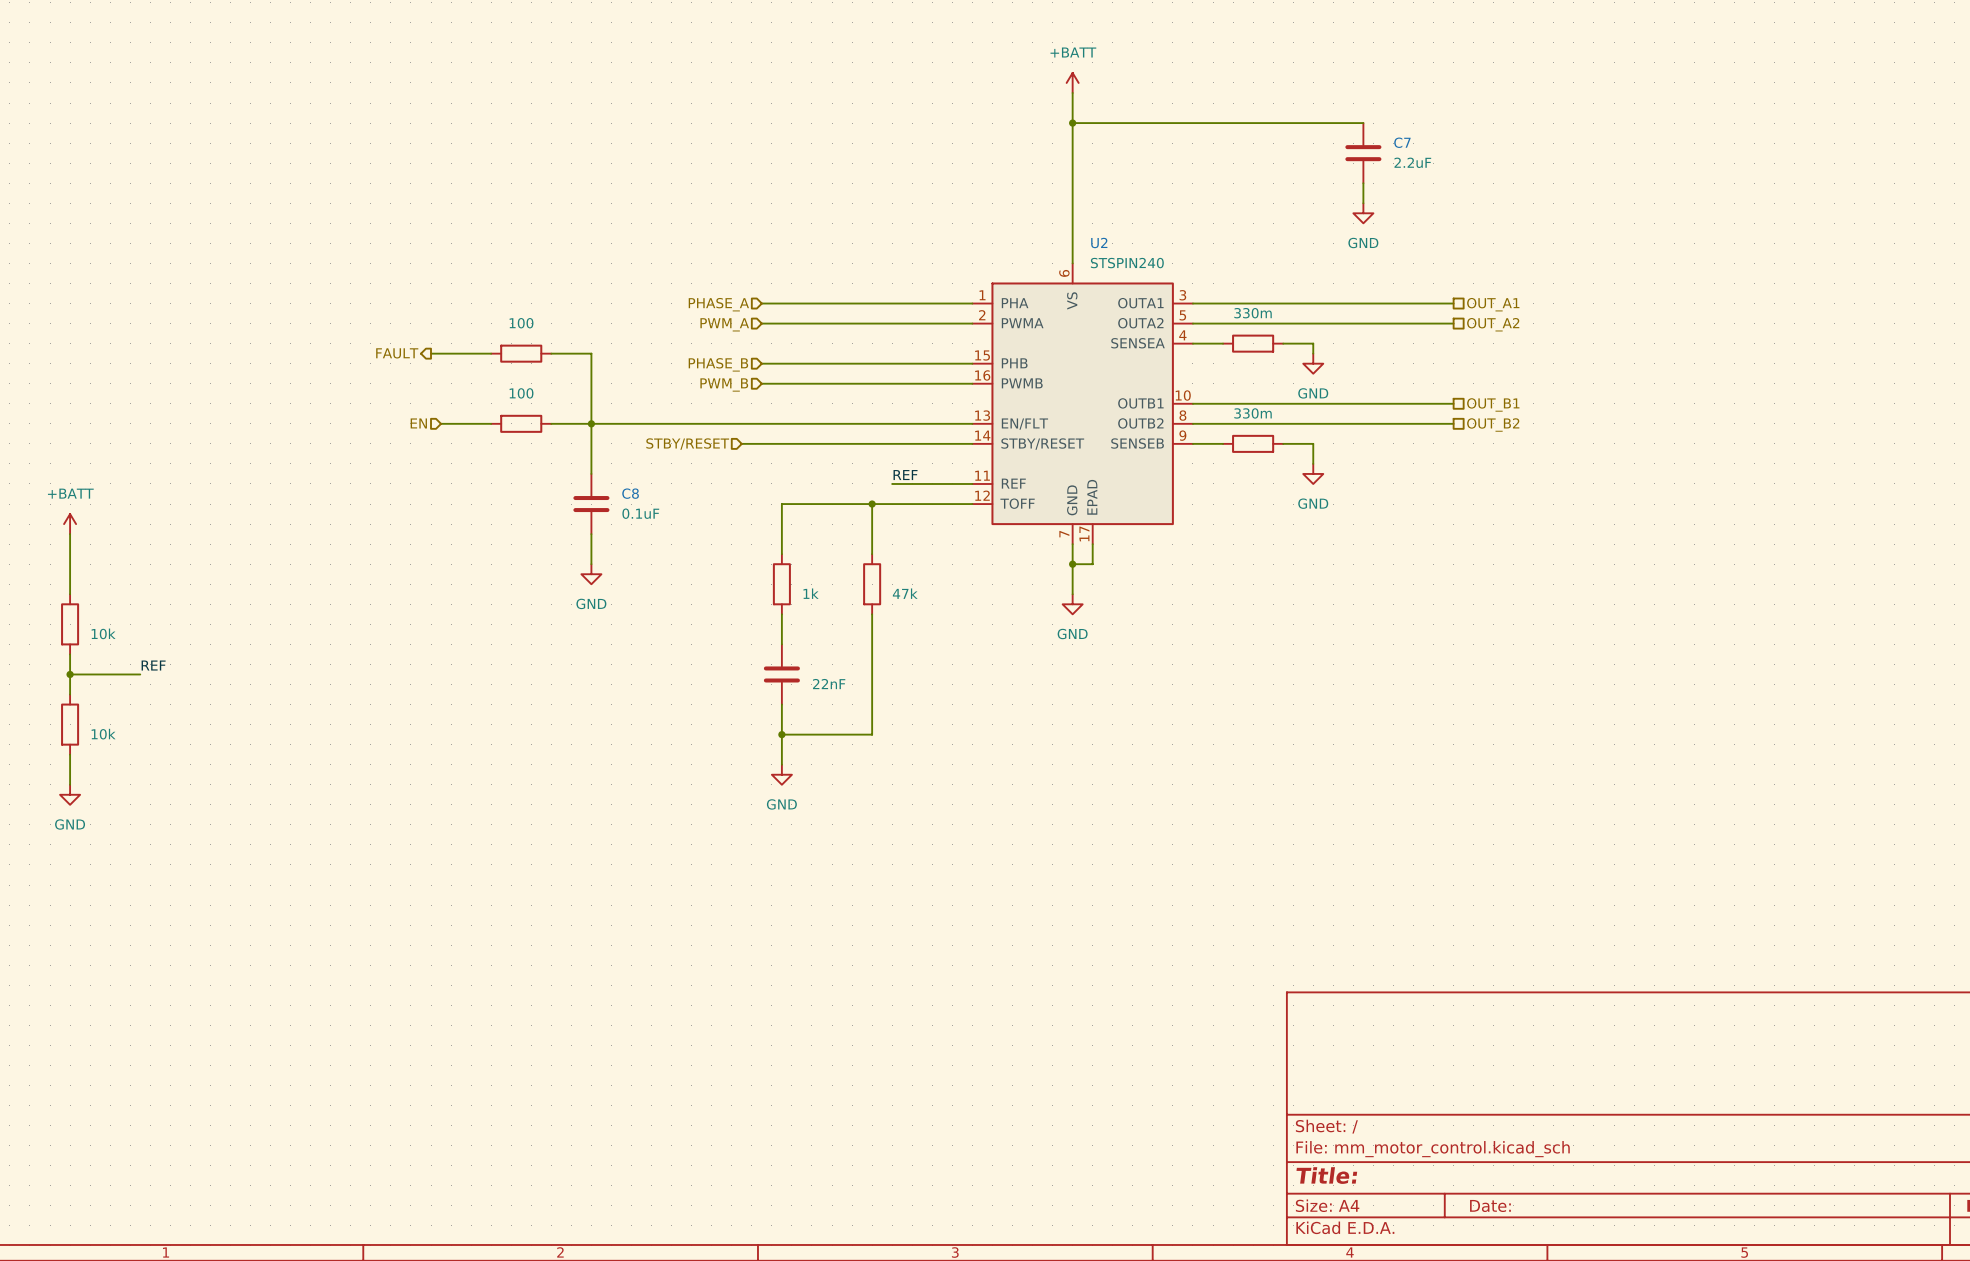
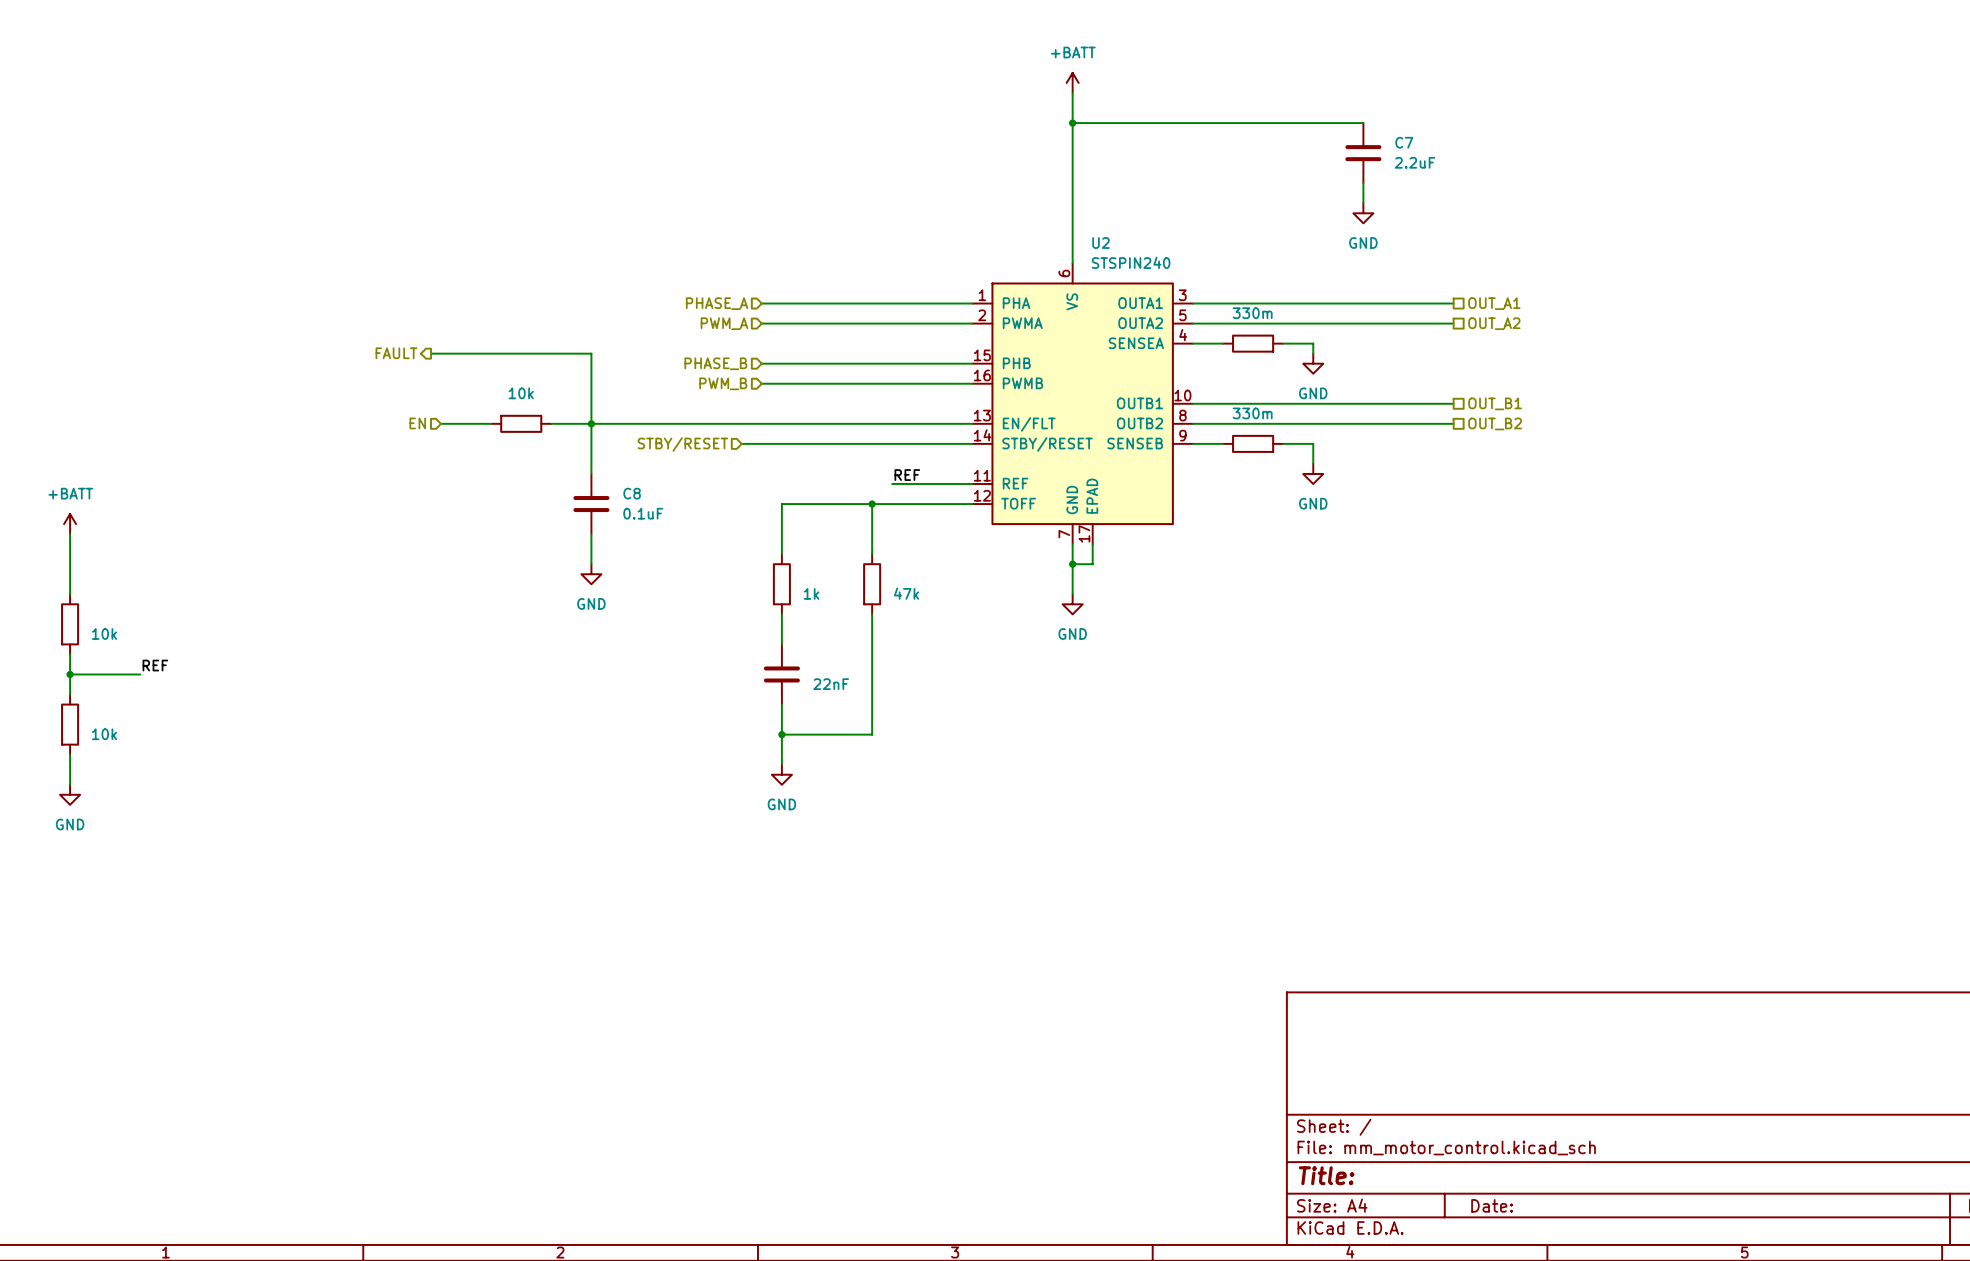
wire: none -> (491, 353) (551, 353)
part: 100 (521, 353) -> none
part value: 100 (521, 393) -> 10k (521, 393)

